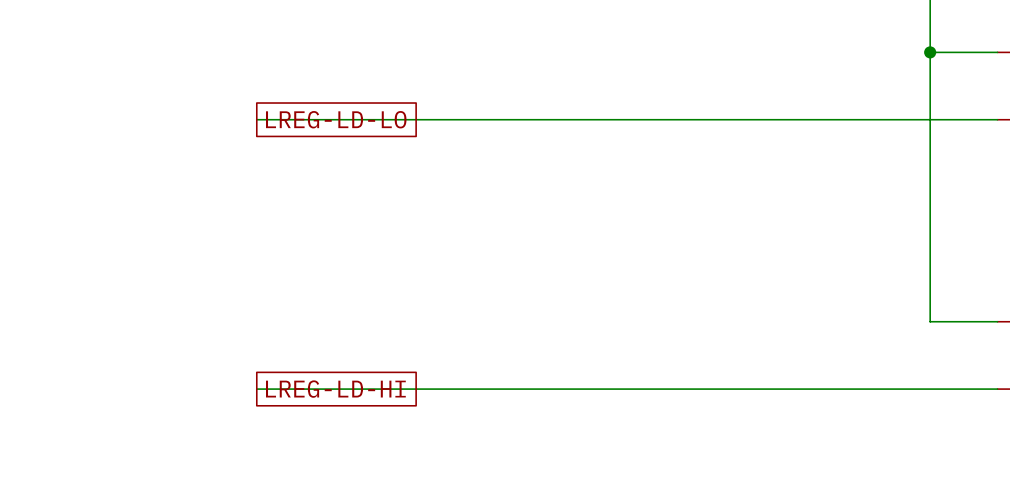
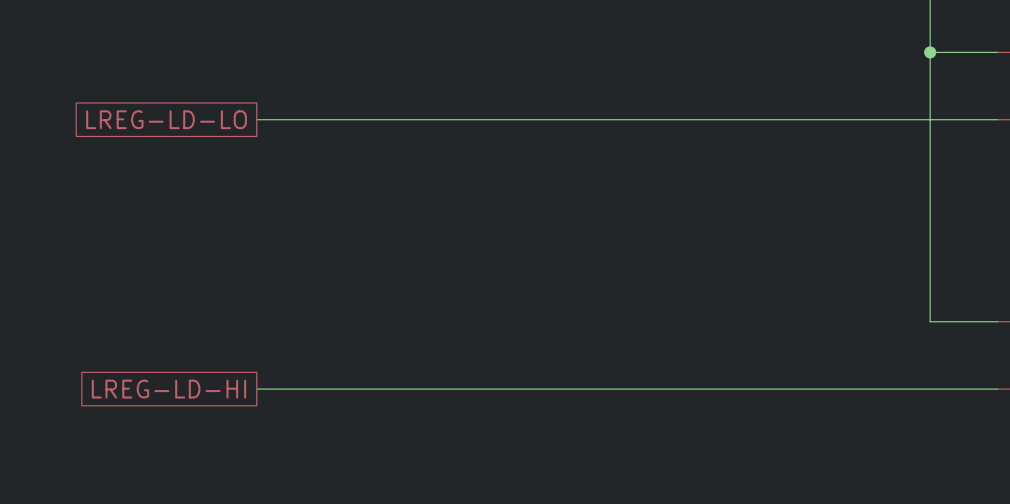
global label rotation: 0° (336, 119) -> 180° (166, 119)
global label rotation: 0° (335, 389) -> 180° (168, 389)

